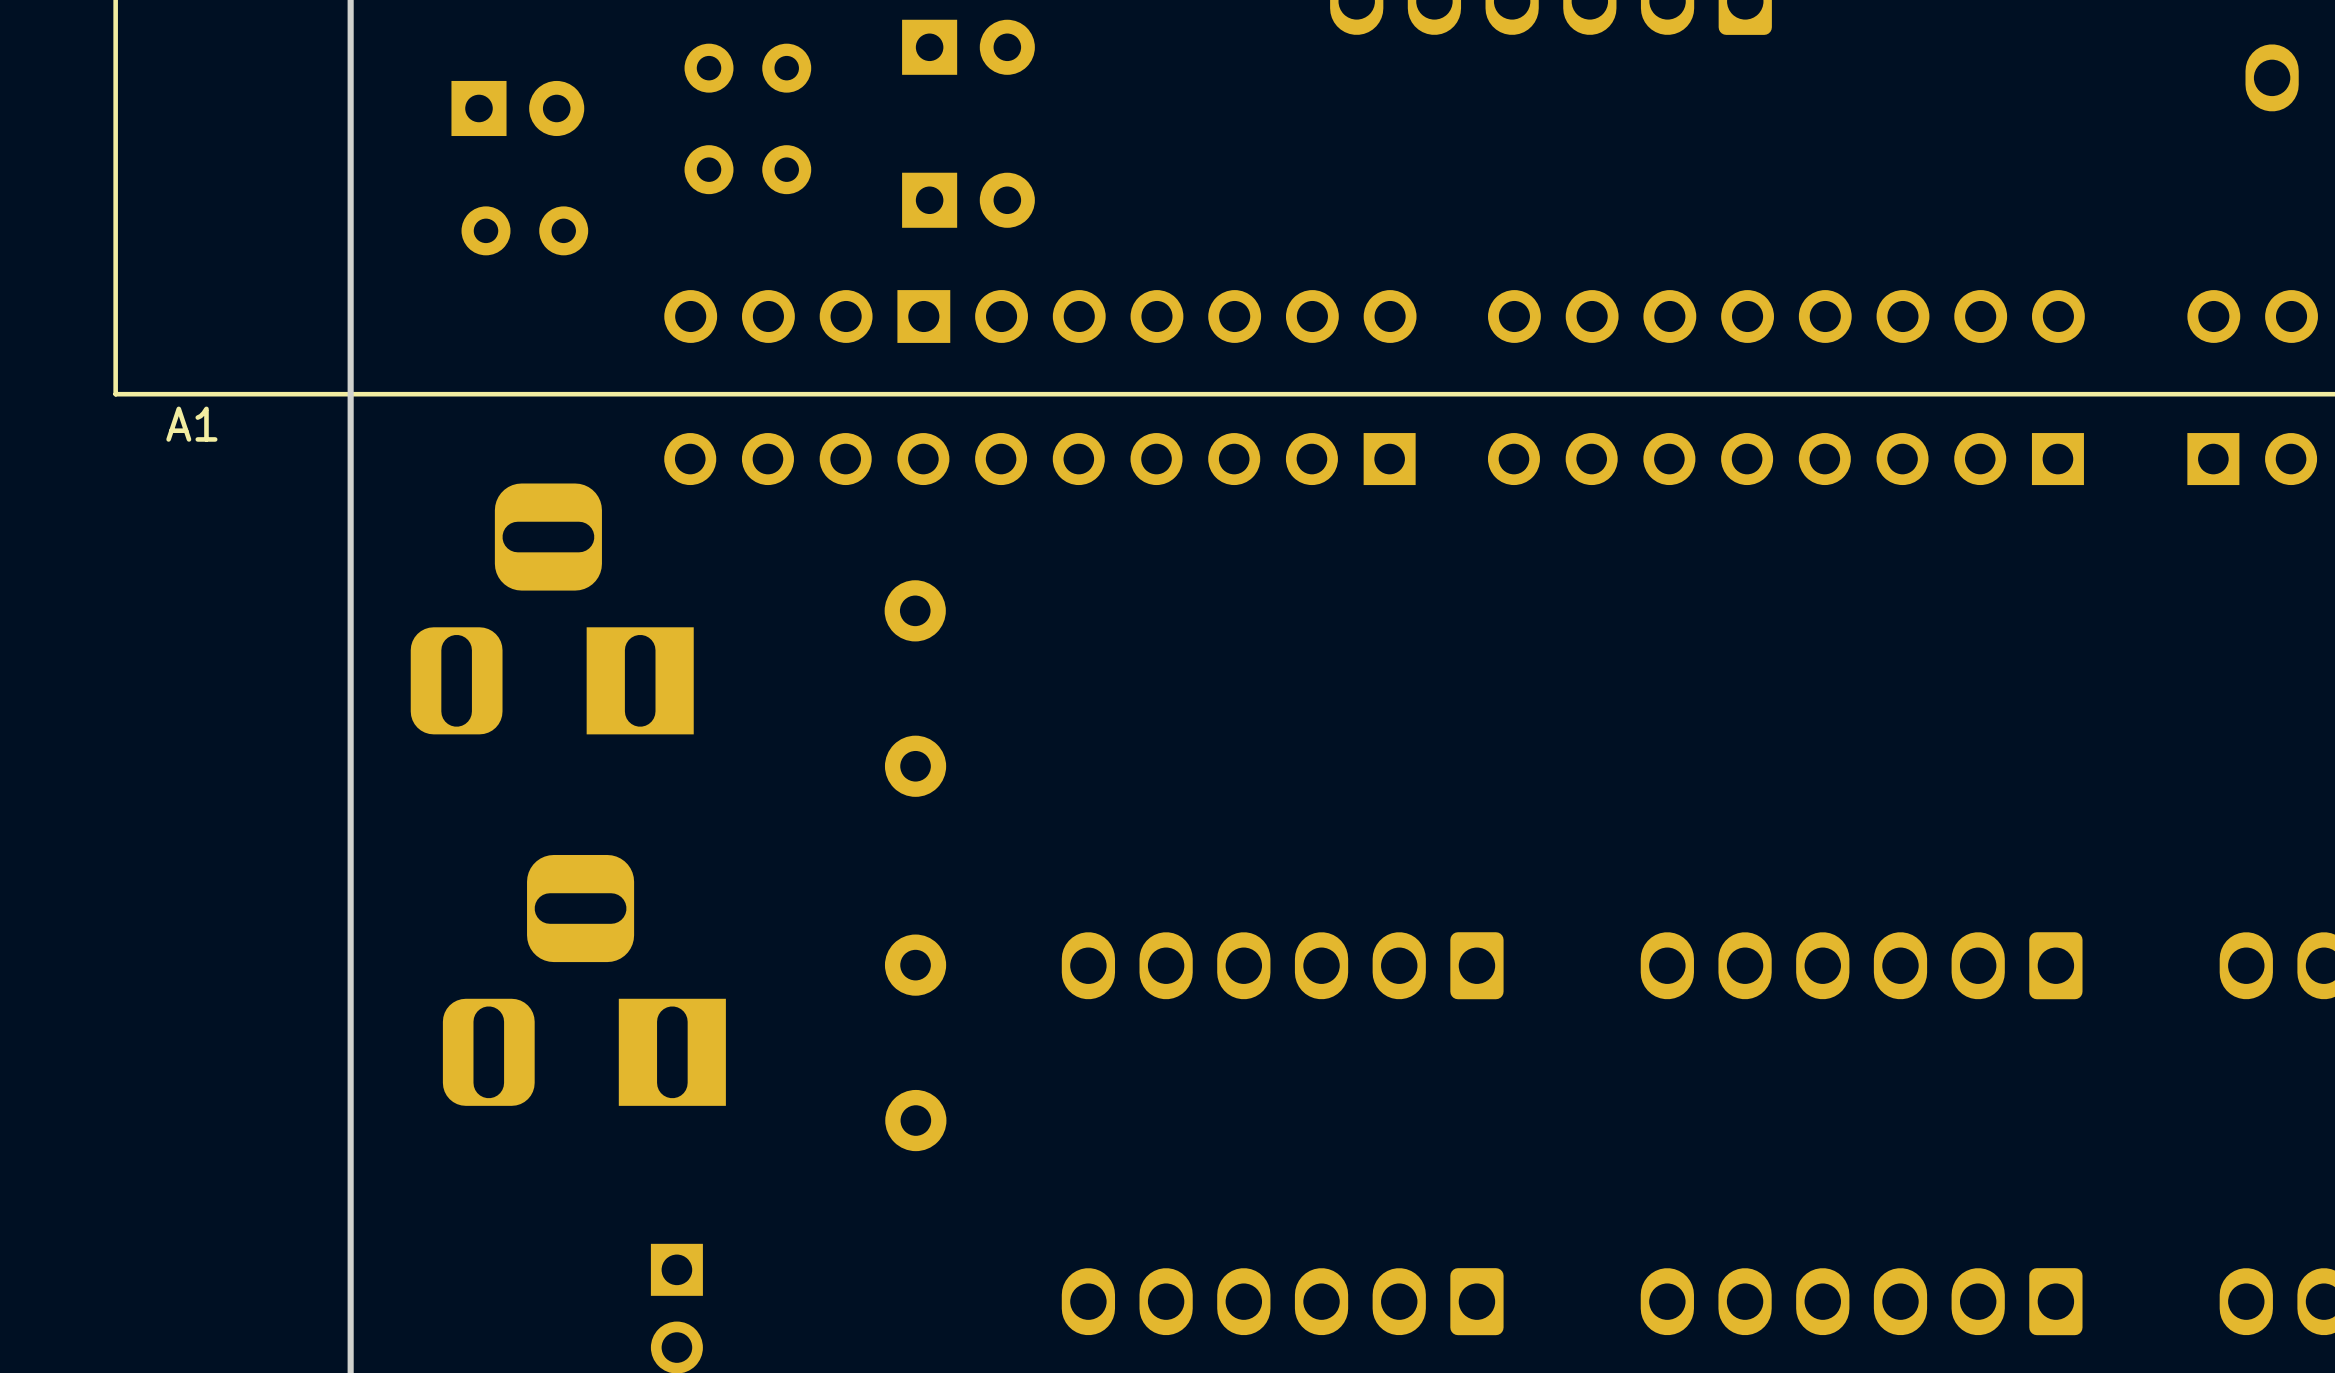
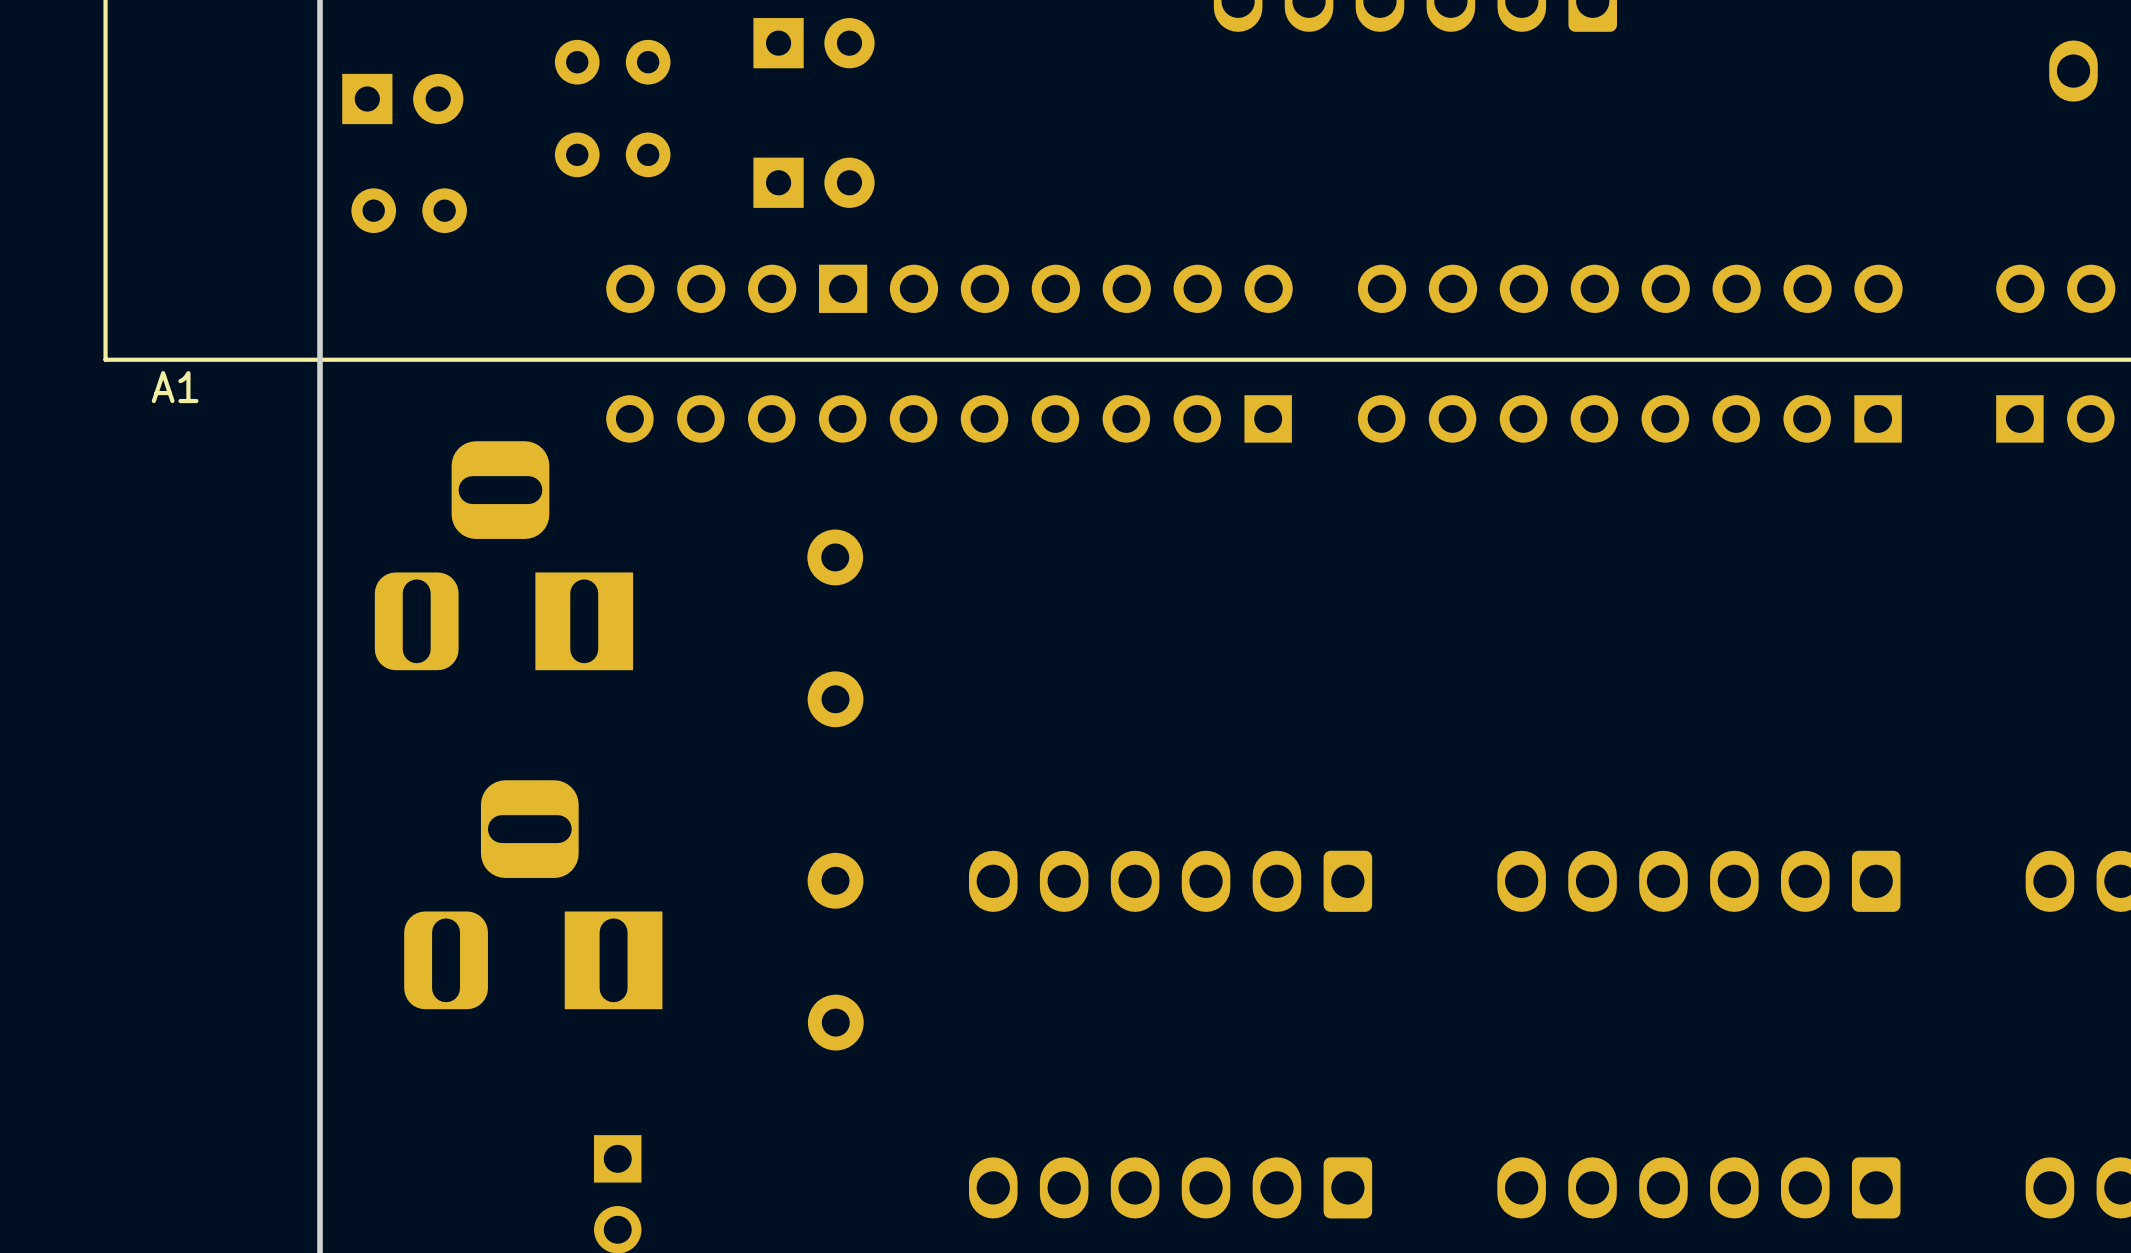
part position: (968, 47) -> (814, 43)
part: none -> (612, 62)
part: (747, 68) -> none
part position: (517, 108) -> (402, 99)
part: none -> (612, 154)
part: (747, 169) -> none
part position: (968, 200) -> (814, 182)
part position: (524, 230) -> (409, 210)

